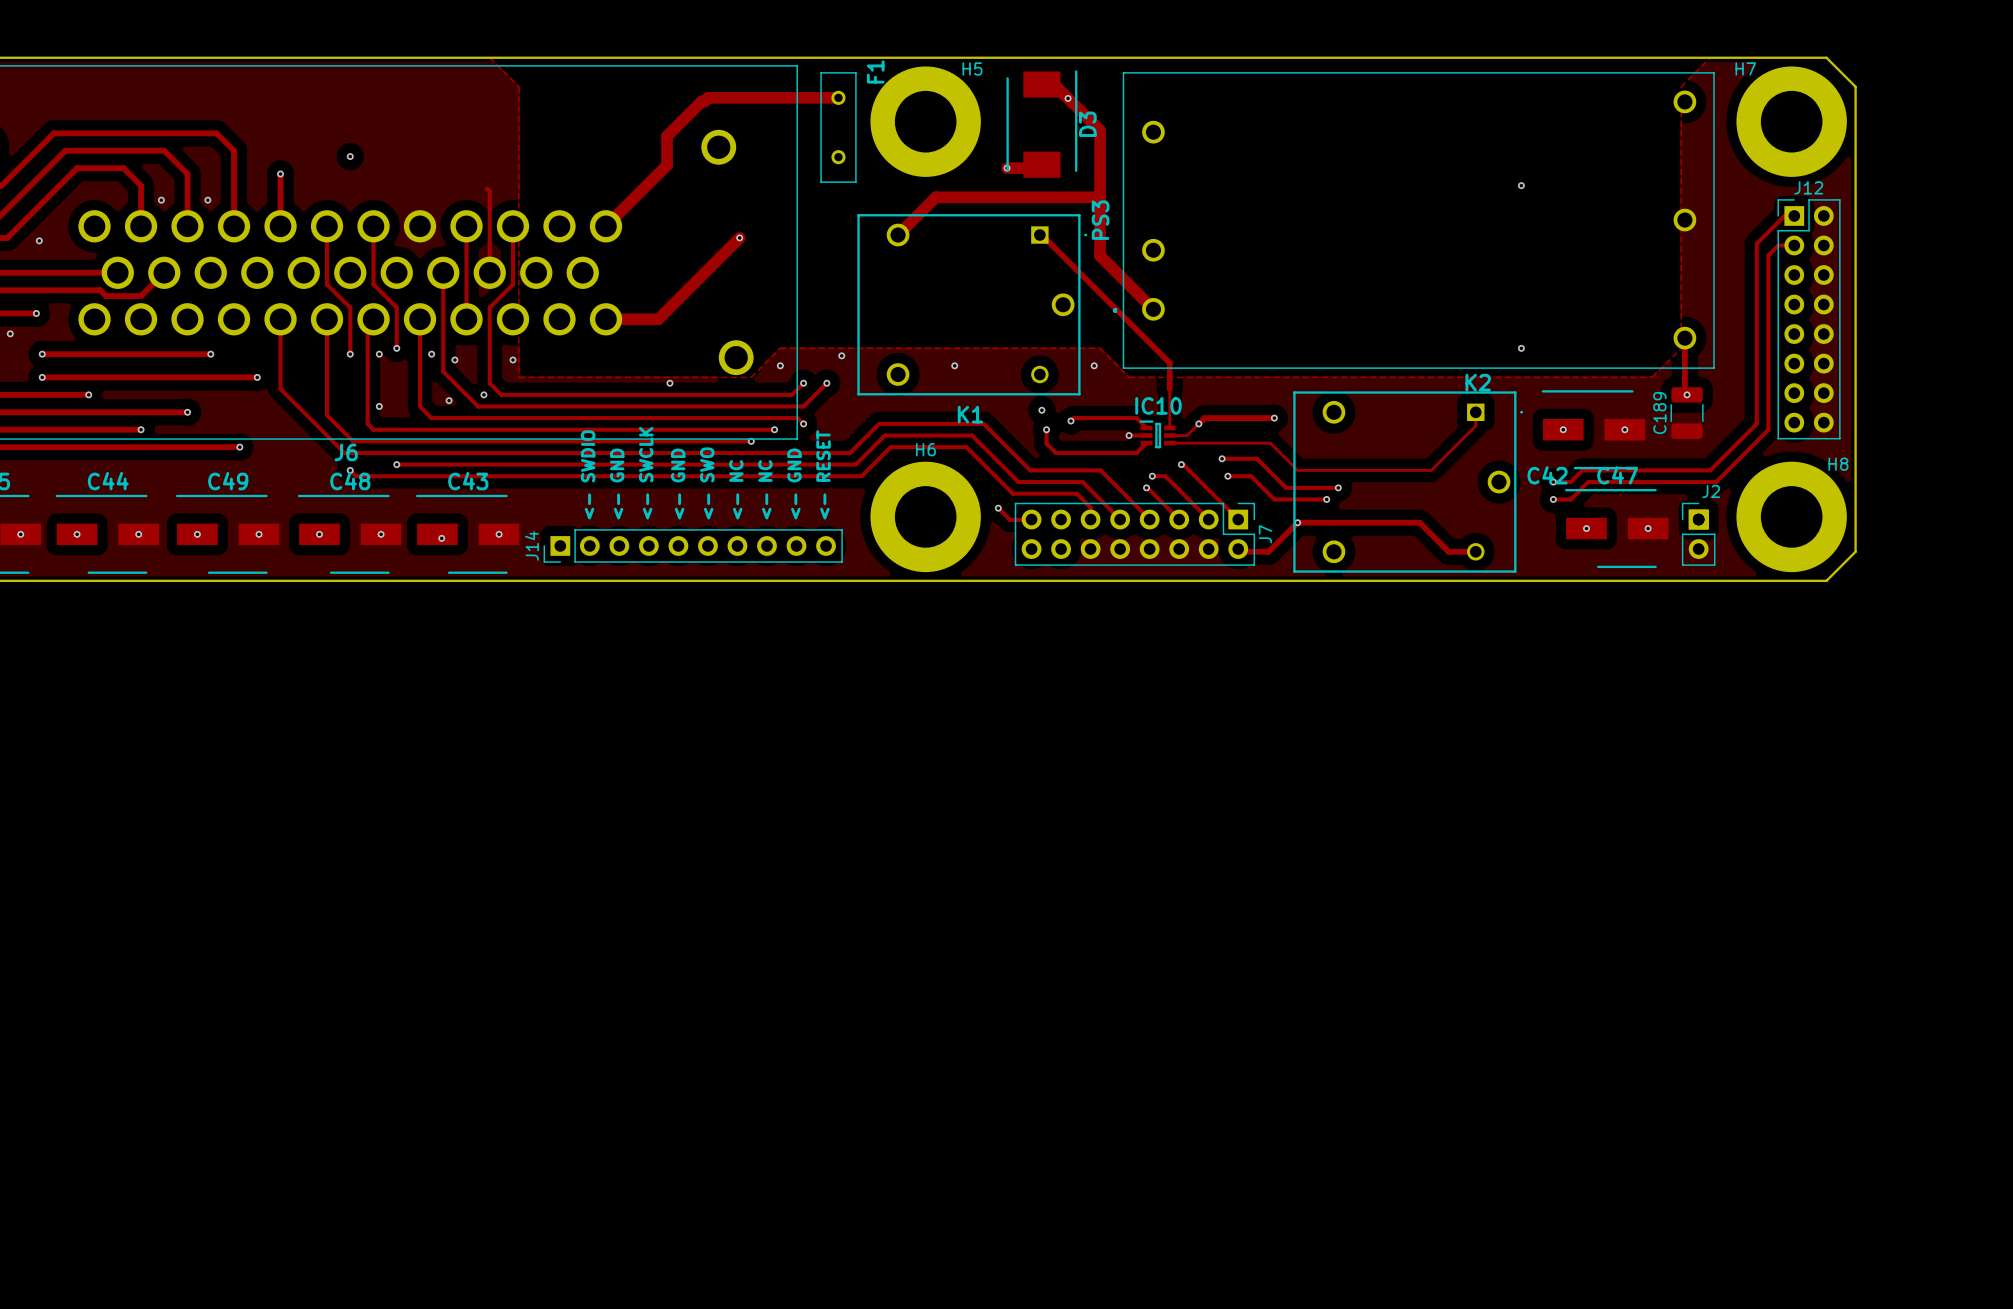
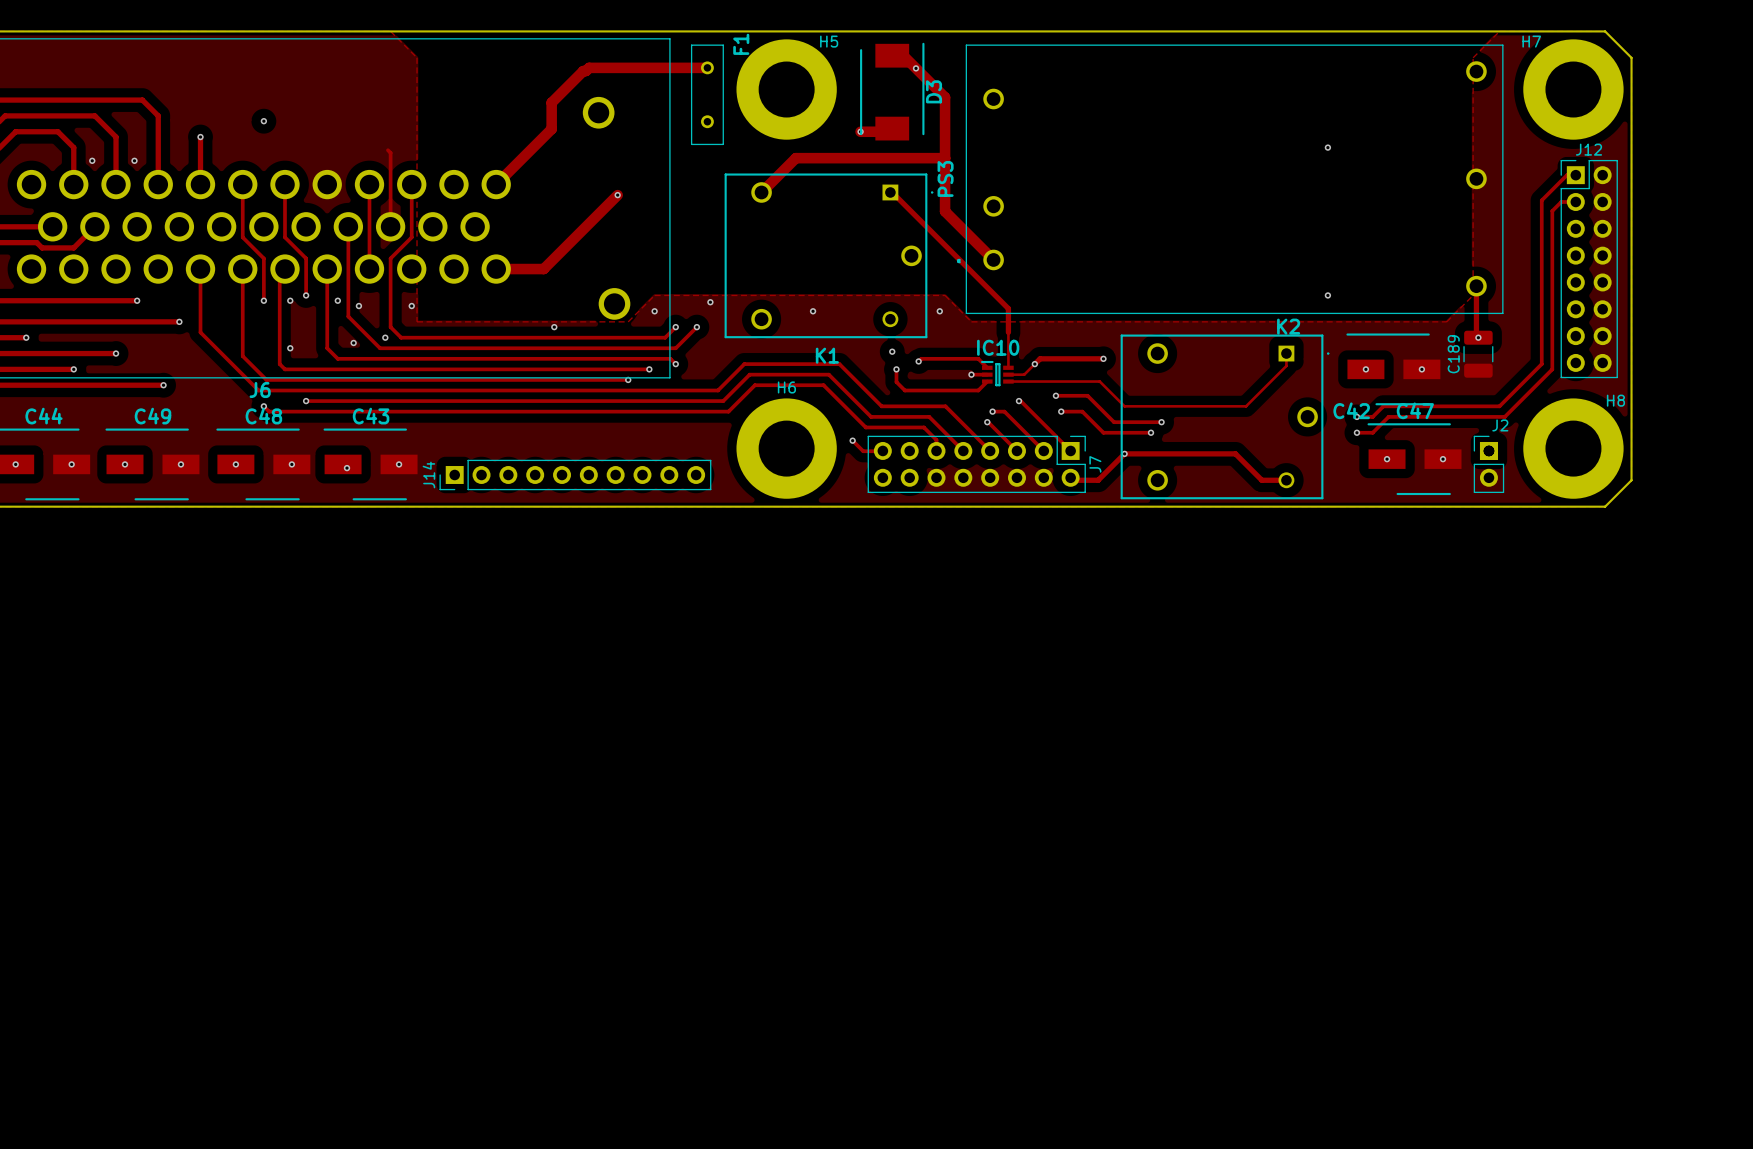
text: <- SWCLK (646, 473) -> none
text: <- SWDIO (588, 474) -> none
text: <- RESET (823, 474) -> none
text: <- SWO (707, 483) -> none
text: <- GND (617, 484) -> none
text: <- GND (678, 484) -> none
text: <- GND (794, 484) -> none
text: <- NC (736, 489) -> none
text: <- NC (765, 489) -> none

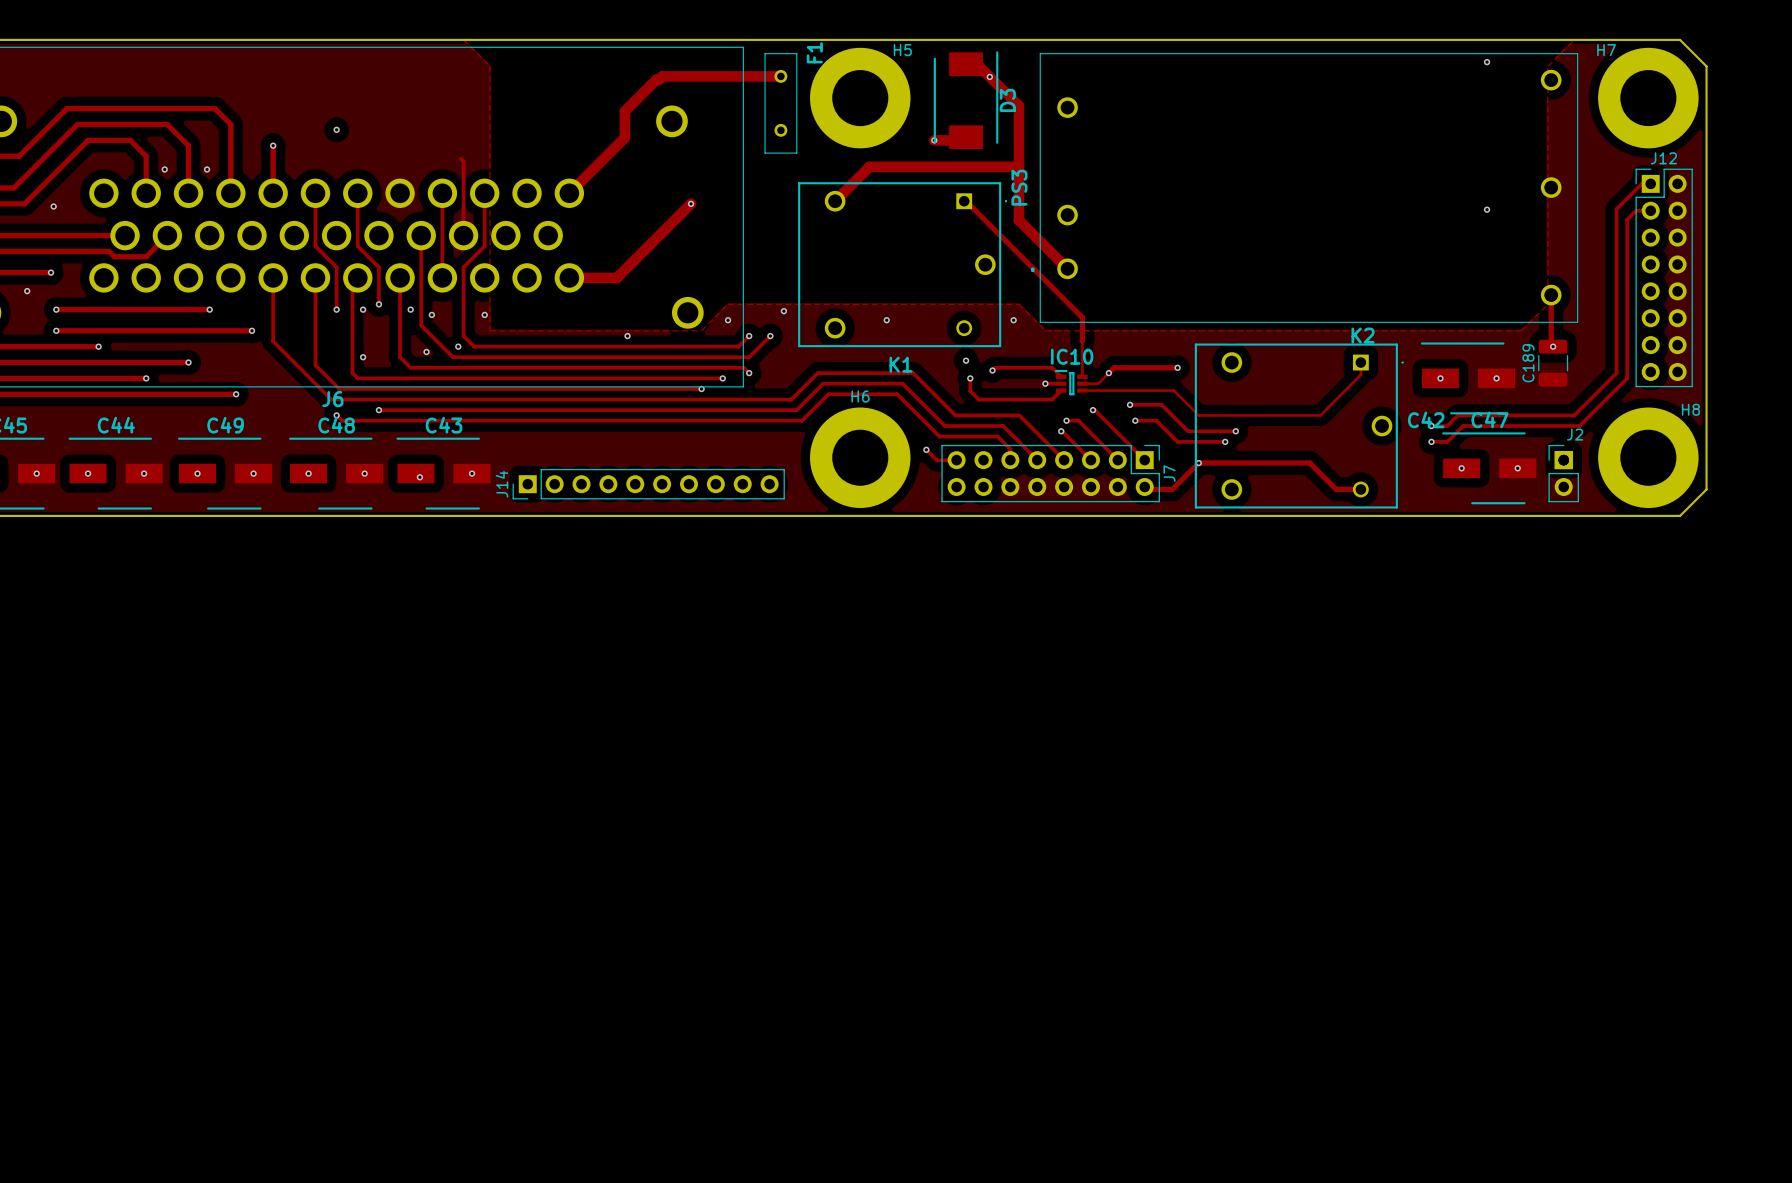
via: none -> (1487, 62)
via: (1327, 147) -> none
via: none -> (1487, 209)
via: (1327, 295) -> none

